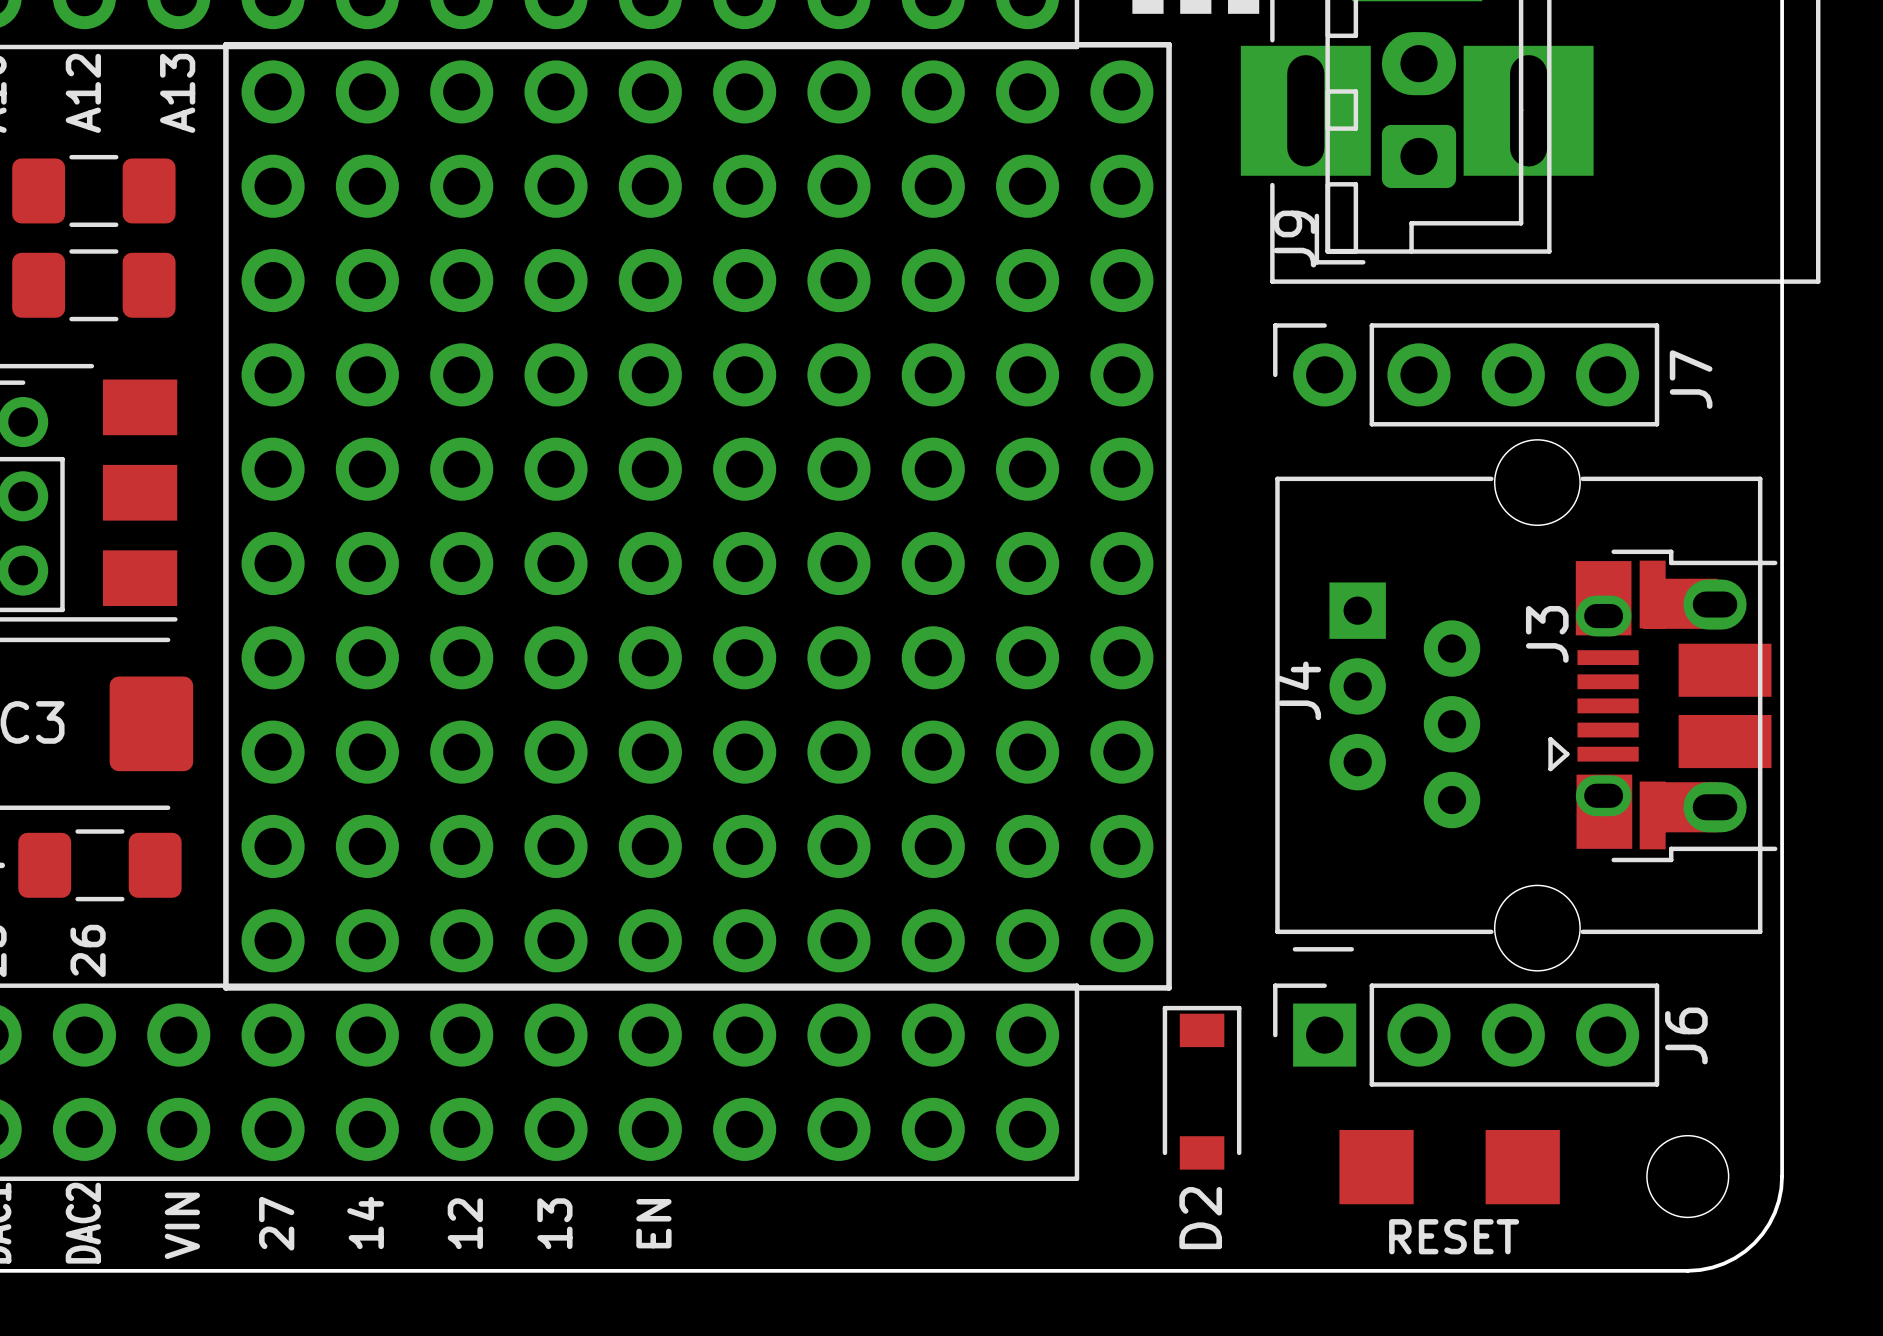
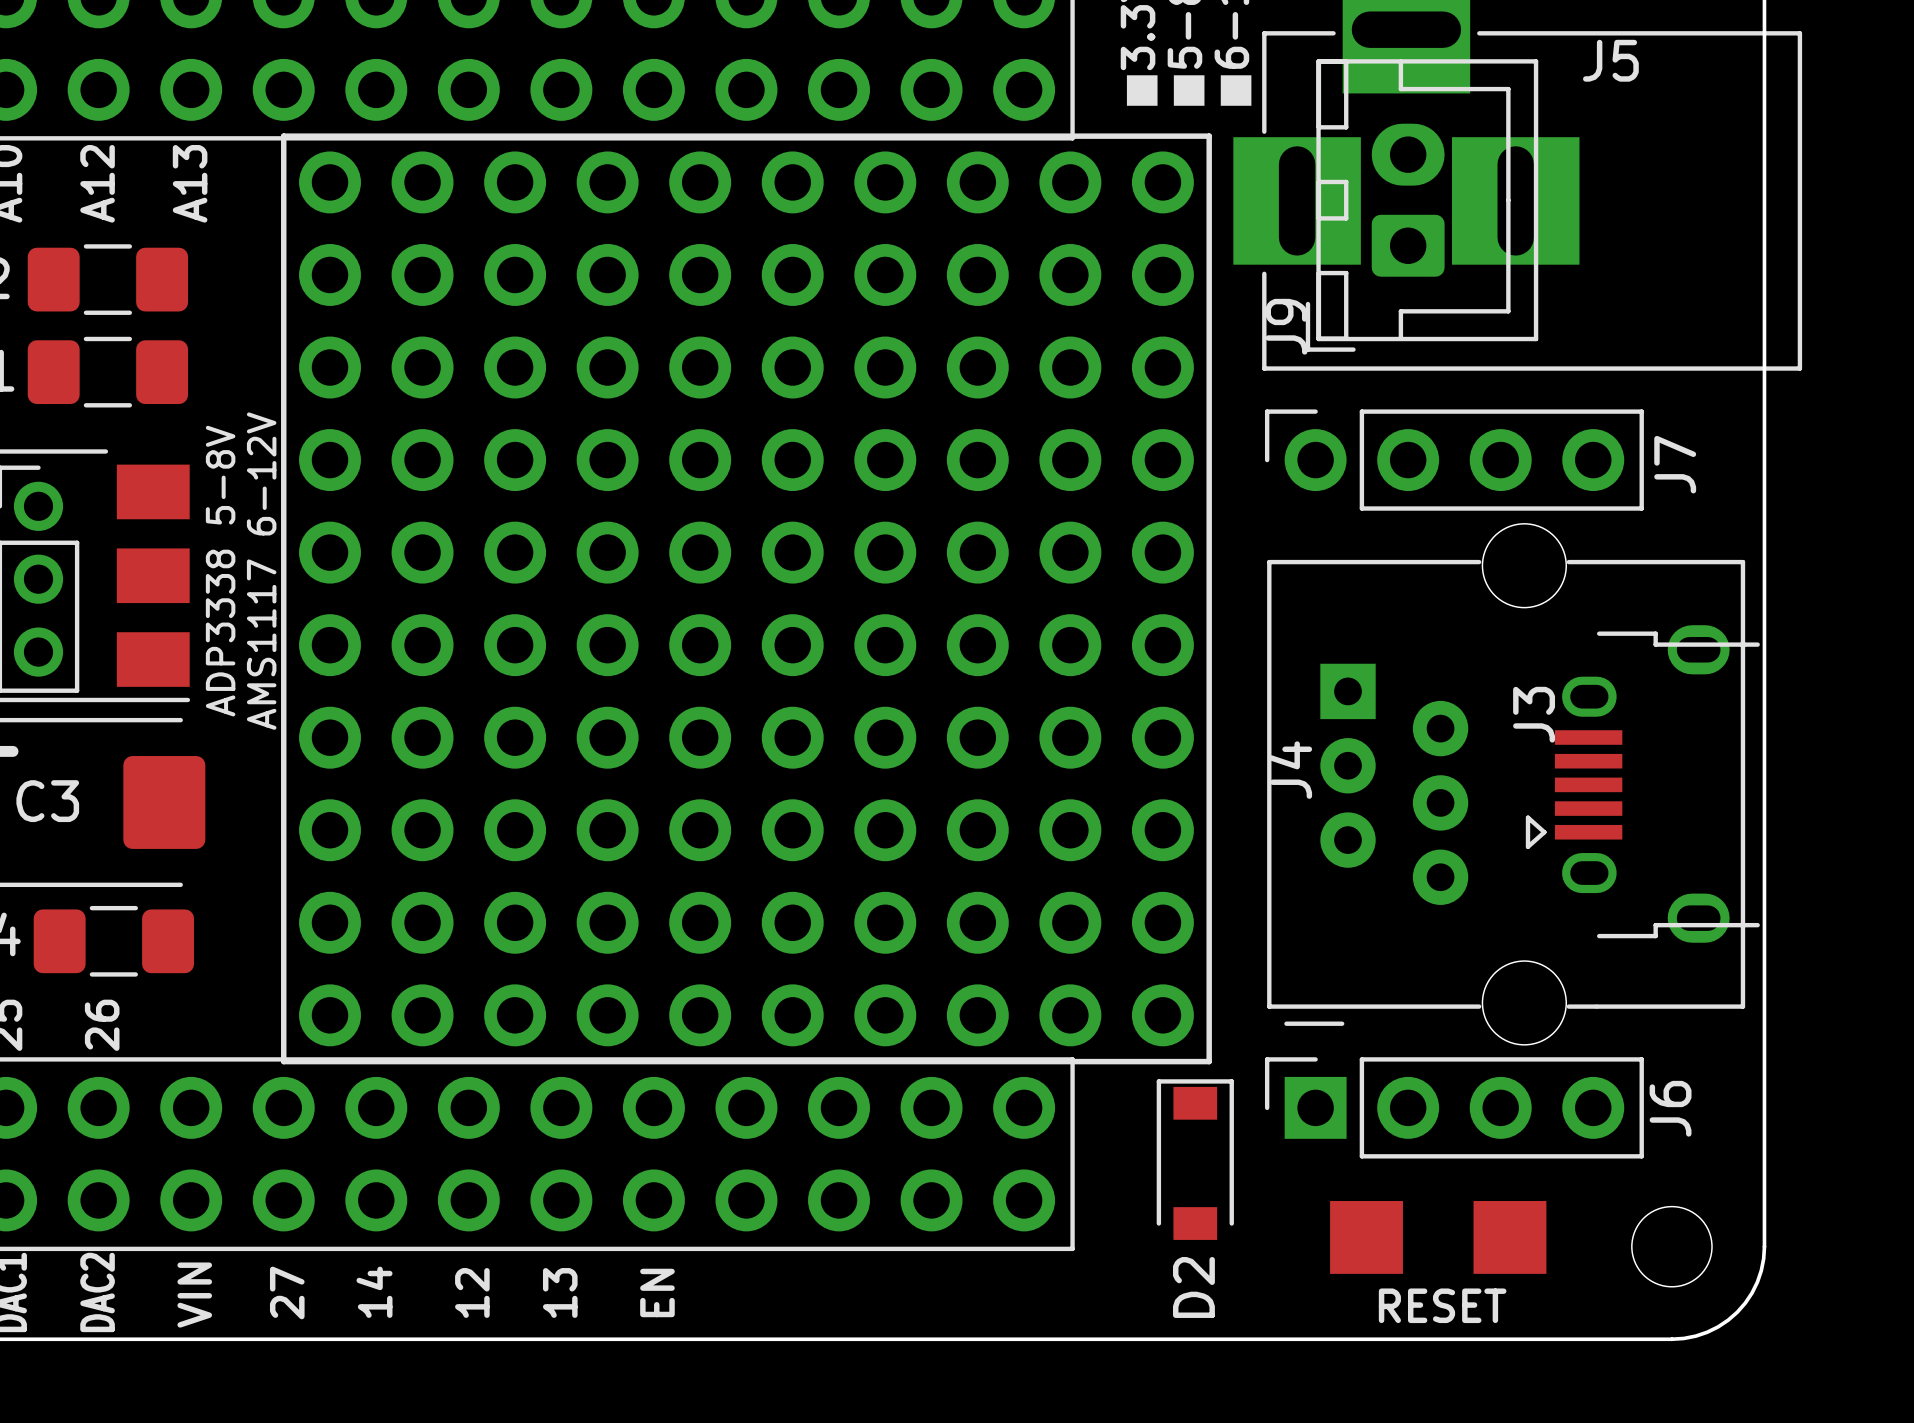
text: none -> ADP3338 5-8V (220, 571)
text: none -> AMS1117 6-12V (261, 571)
part position: (697, 516) -> (746, 598)
J3 footprint: [1548, 549, 1778, 863] -> [1525, 625, 1760, 943]

